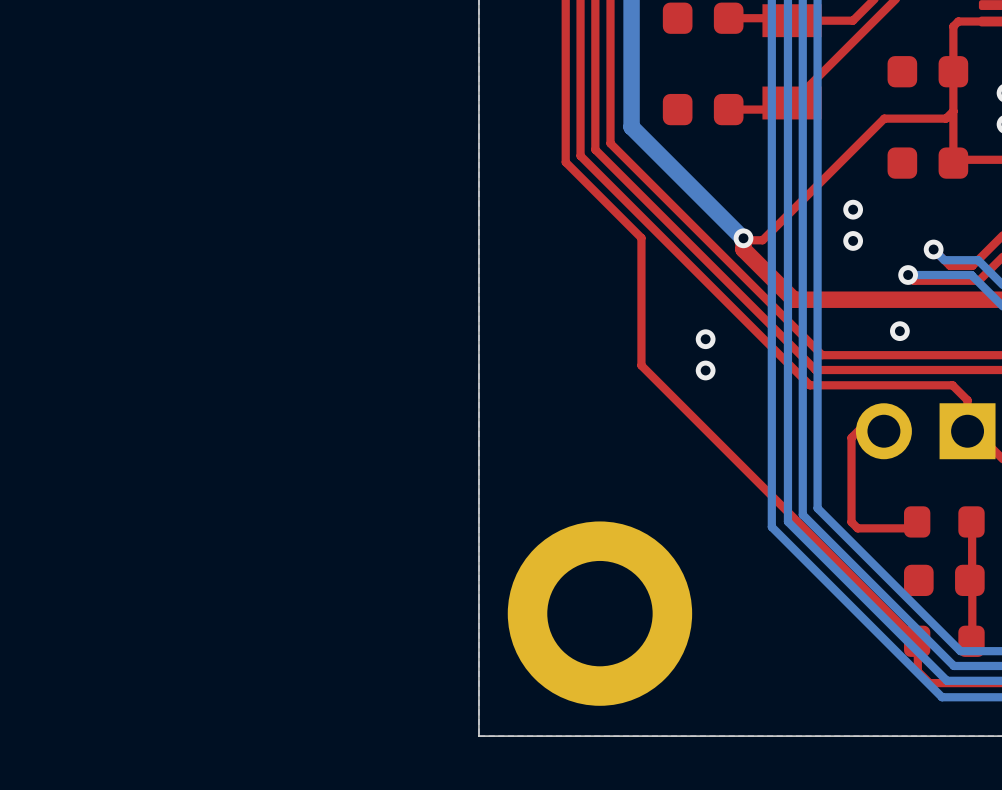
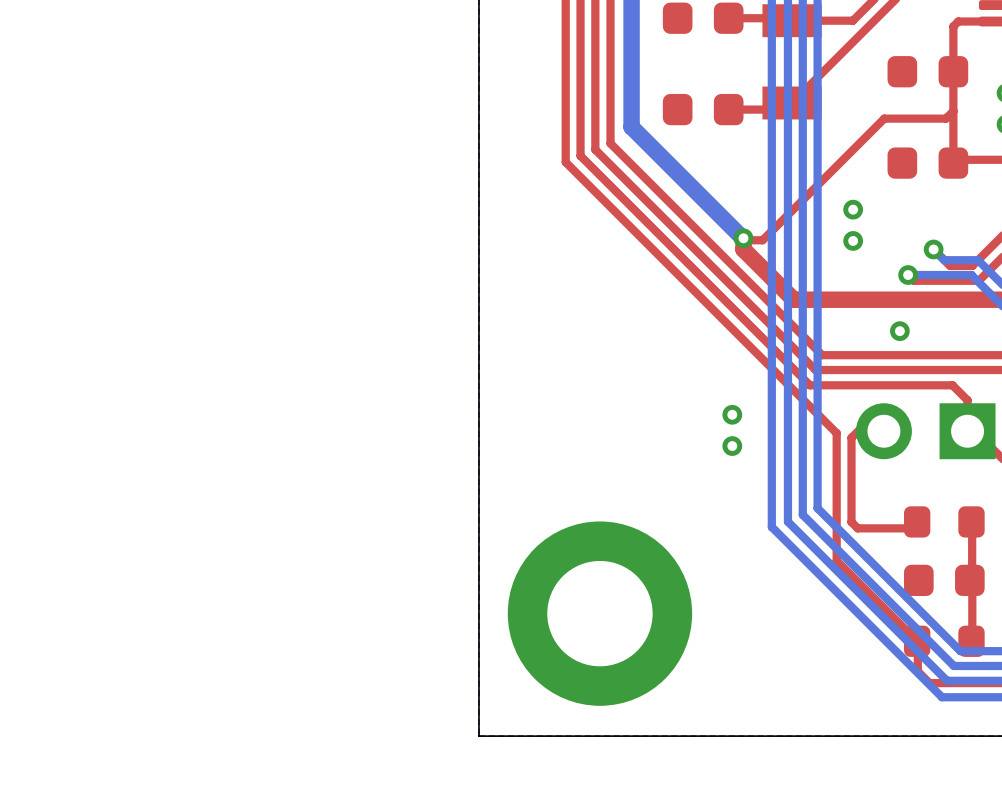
top track: (641, 237) (641, 365) (836, 560) -> (641, 237) (836, 433) (836, 560)
via: (705, 339) -> none
via: (705, 370) -> none
via: none -> (732, 414)
via: none -> (732, 446)

